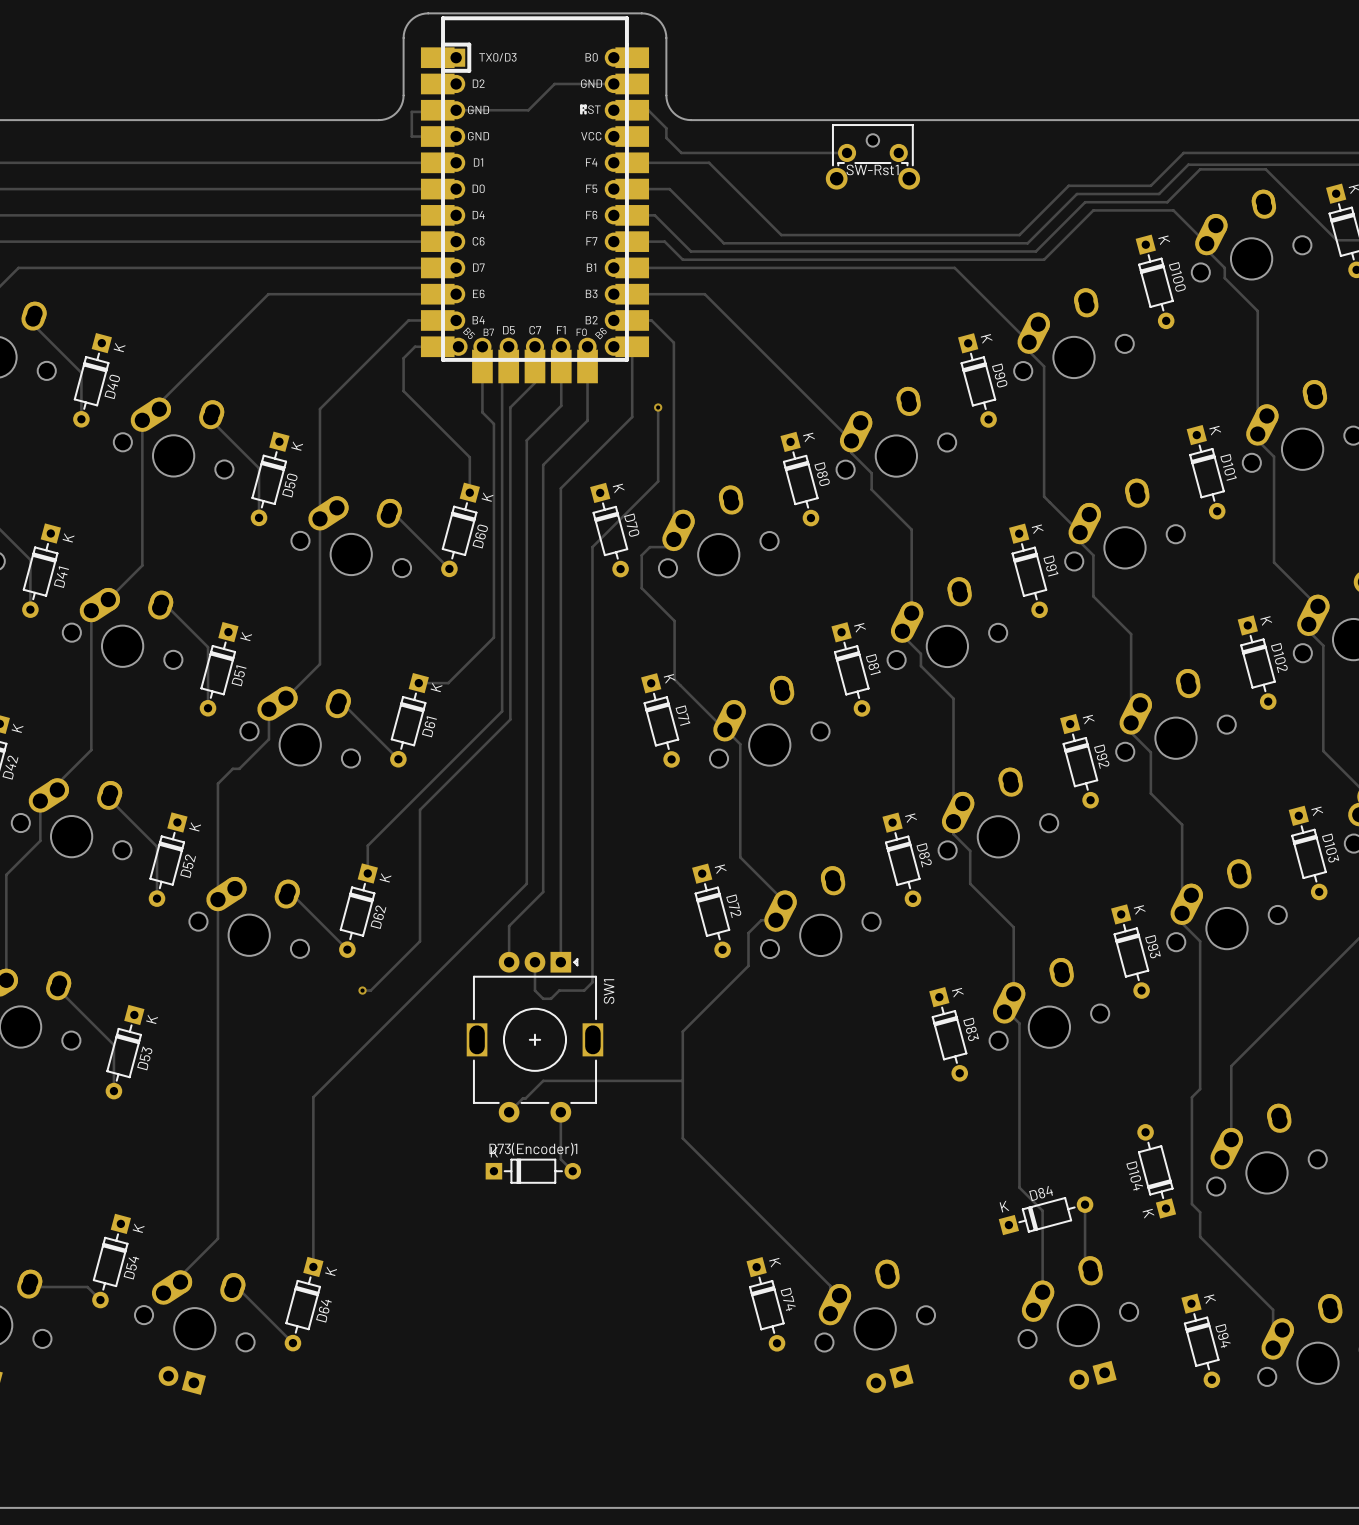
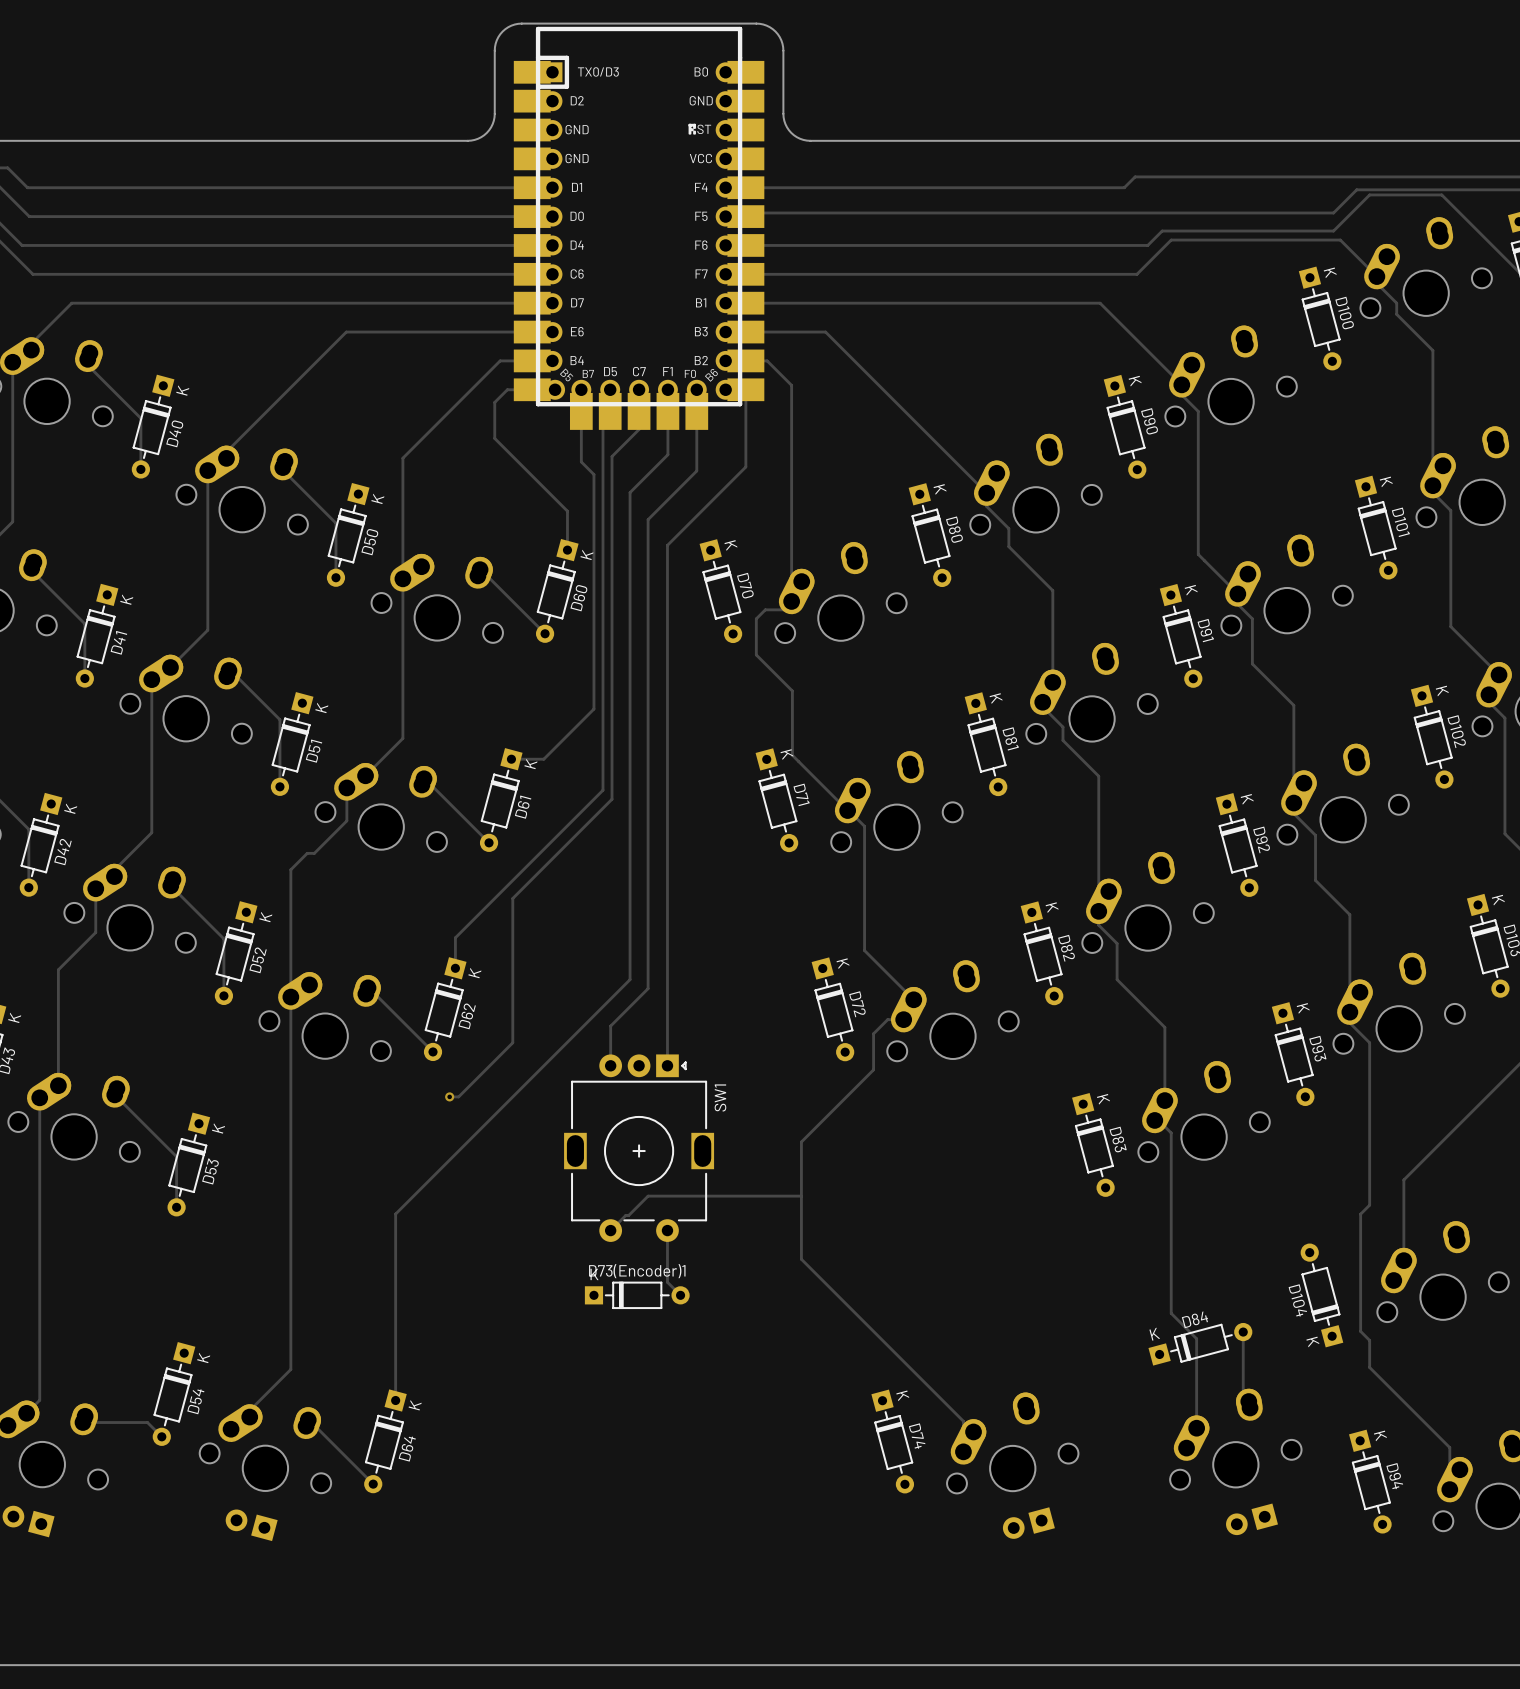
track: (613, 83) (554, 83) (528, 110) (411, 111) (411, 136) (456, 136) -> none
track: (613, 110) (648, 110) (666, 128) (666, 137) (681, 152) (847, 152) -> none
track: (1183, 152) (1150, 185) -> (1333, 212) (1315, 212)
track: none -> (1351, 176) (1135, 176) (1124, 187) (830, 187)
SW-Rst1: (872, 156) -> none
track: (709, 162) (781, 235) (1019, 235) (1068, 185) -> (749, 212) (1225, 212)
track: (1167, 185) (1159, 194) (1076, 194) (1027, 243) (723, 243) (669, 189) (632, 189) -> none
track: (1085, 202) (1035, 251) (691, 251) (654, 215) -> (1243, 231) (1162, 231) (1147, 245) (770, 245)
track: (1093, 210) (1044, 259) (682, 259) (664, 241) -> (1252, 240) (1171, 240) (1136, 274) (781, 274)
track: (658, 407) (658, 481) (592, 547) (592, 982) (584, 990) (559, 990) (551, 998) (543, 998) (534, 990) (534, 962) -> none
via: (658, 407) -> none

